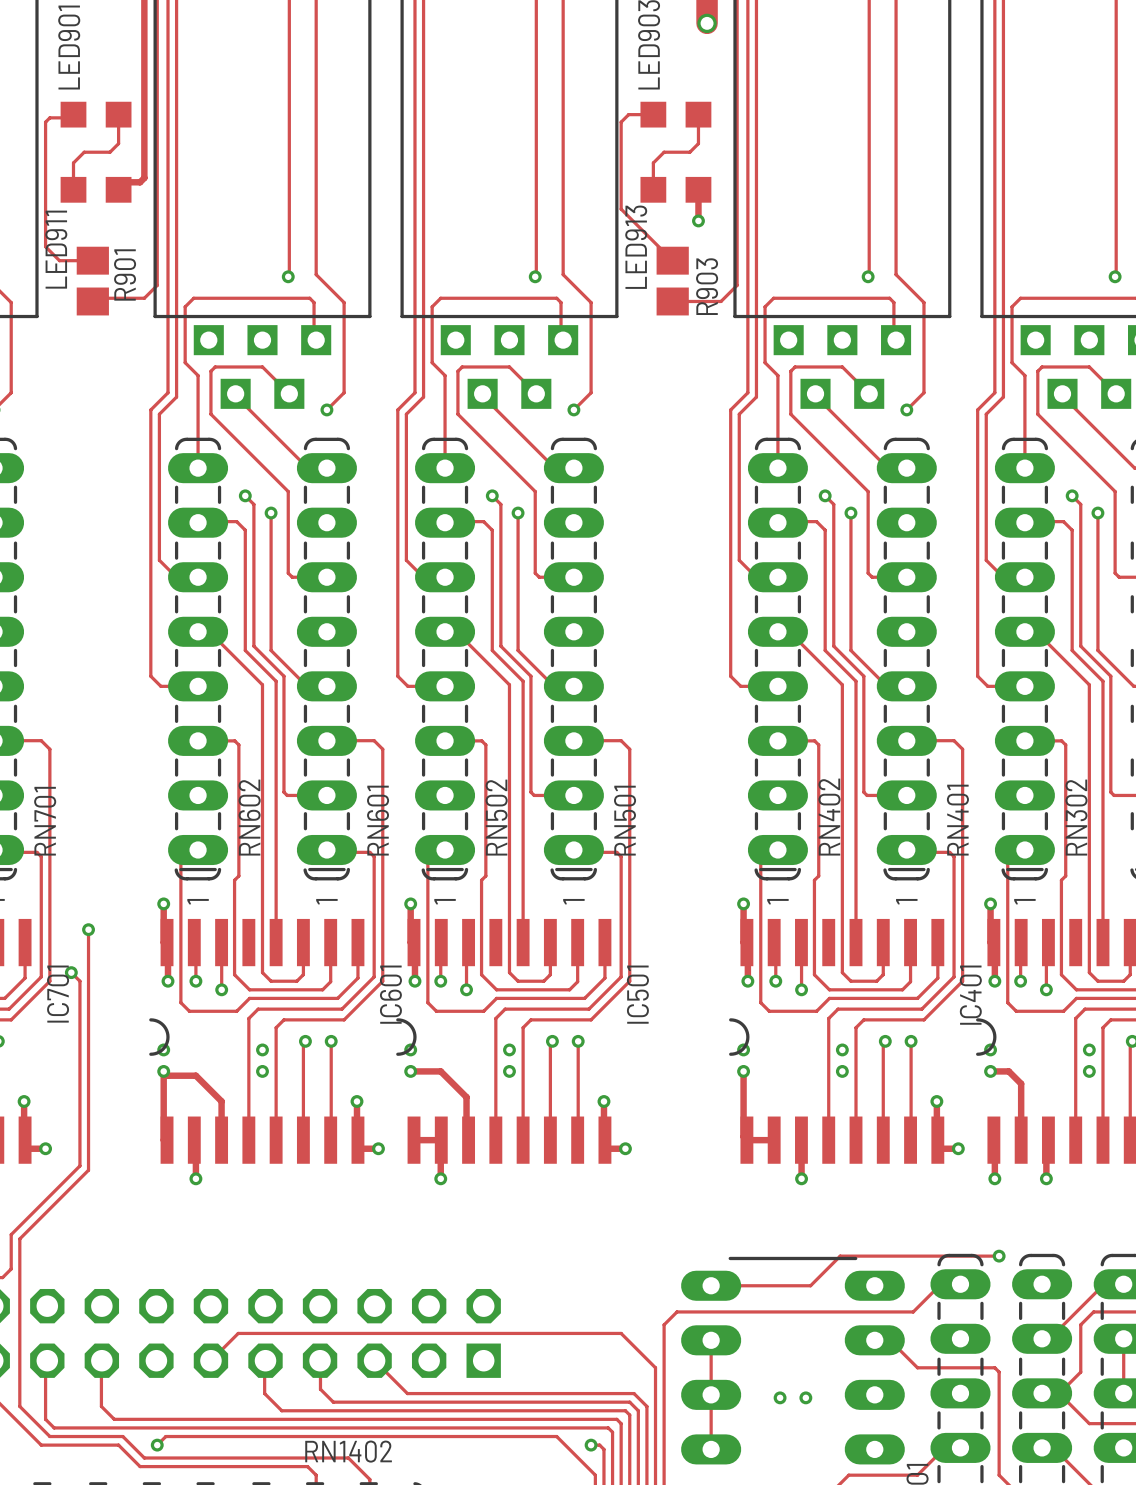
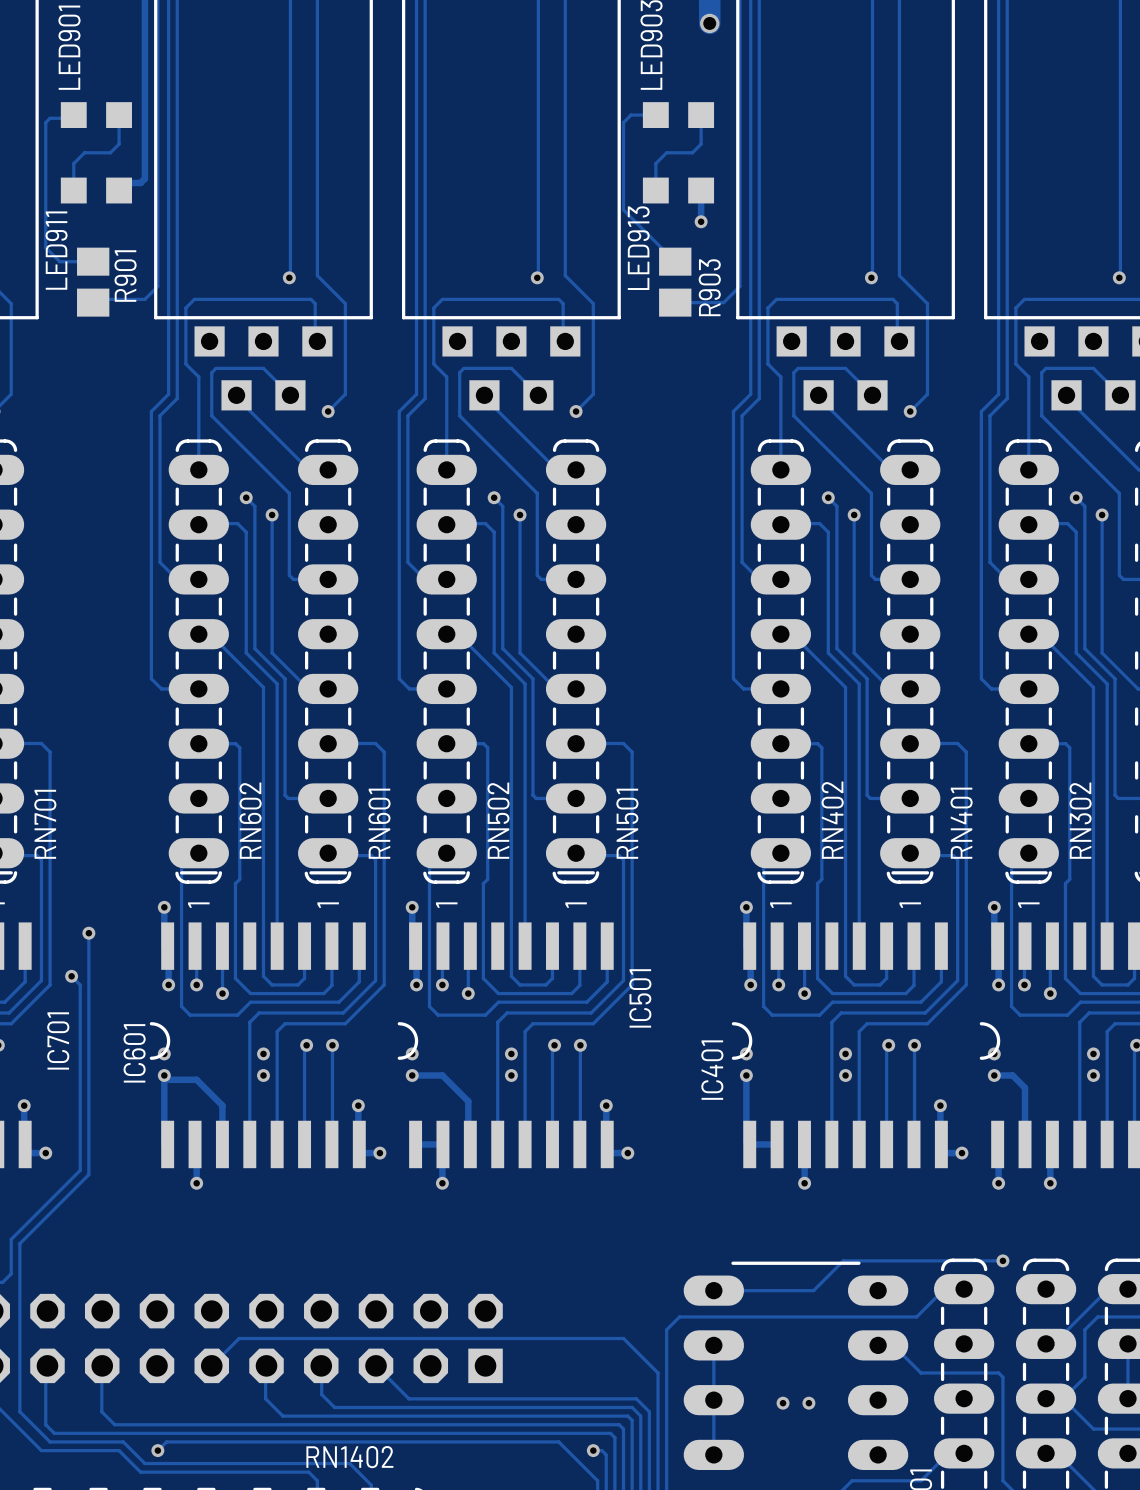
IC701 name position: IC701 (58, 994) -> IC701 (58, 1040)
IC601 name position: IC601 (390, 994) -> IC601 (134, 1053)
IC401 name position: IC401 (970, 995) -> IC401 (712, 1070)

